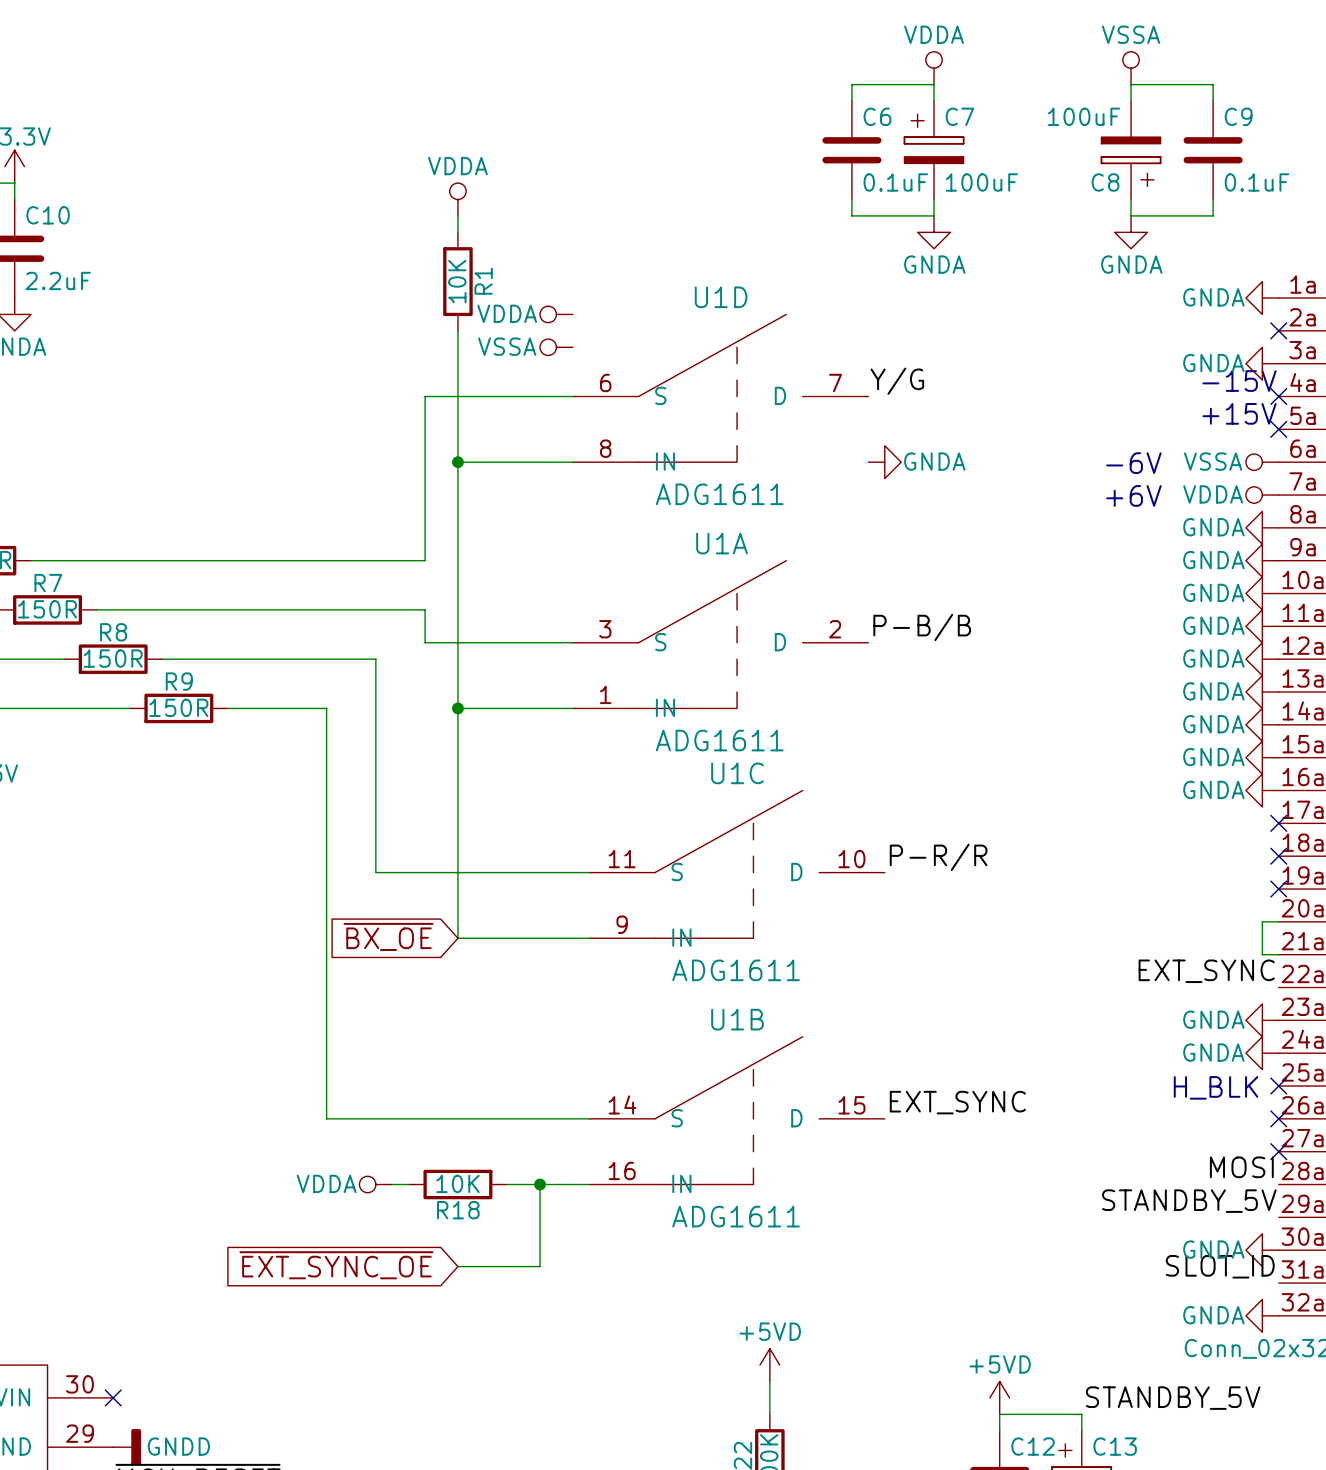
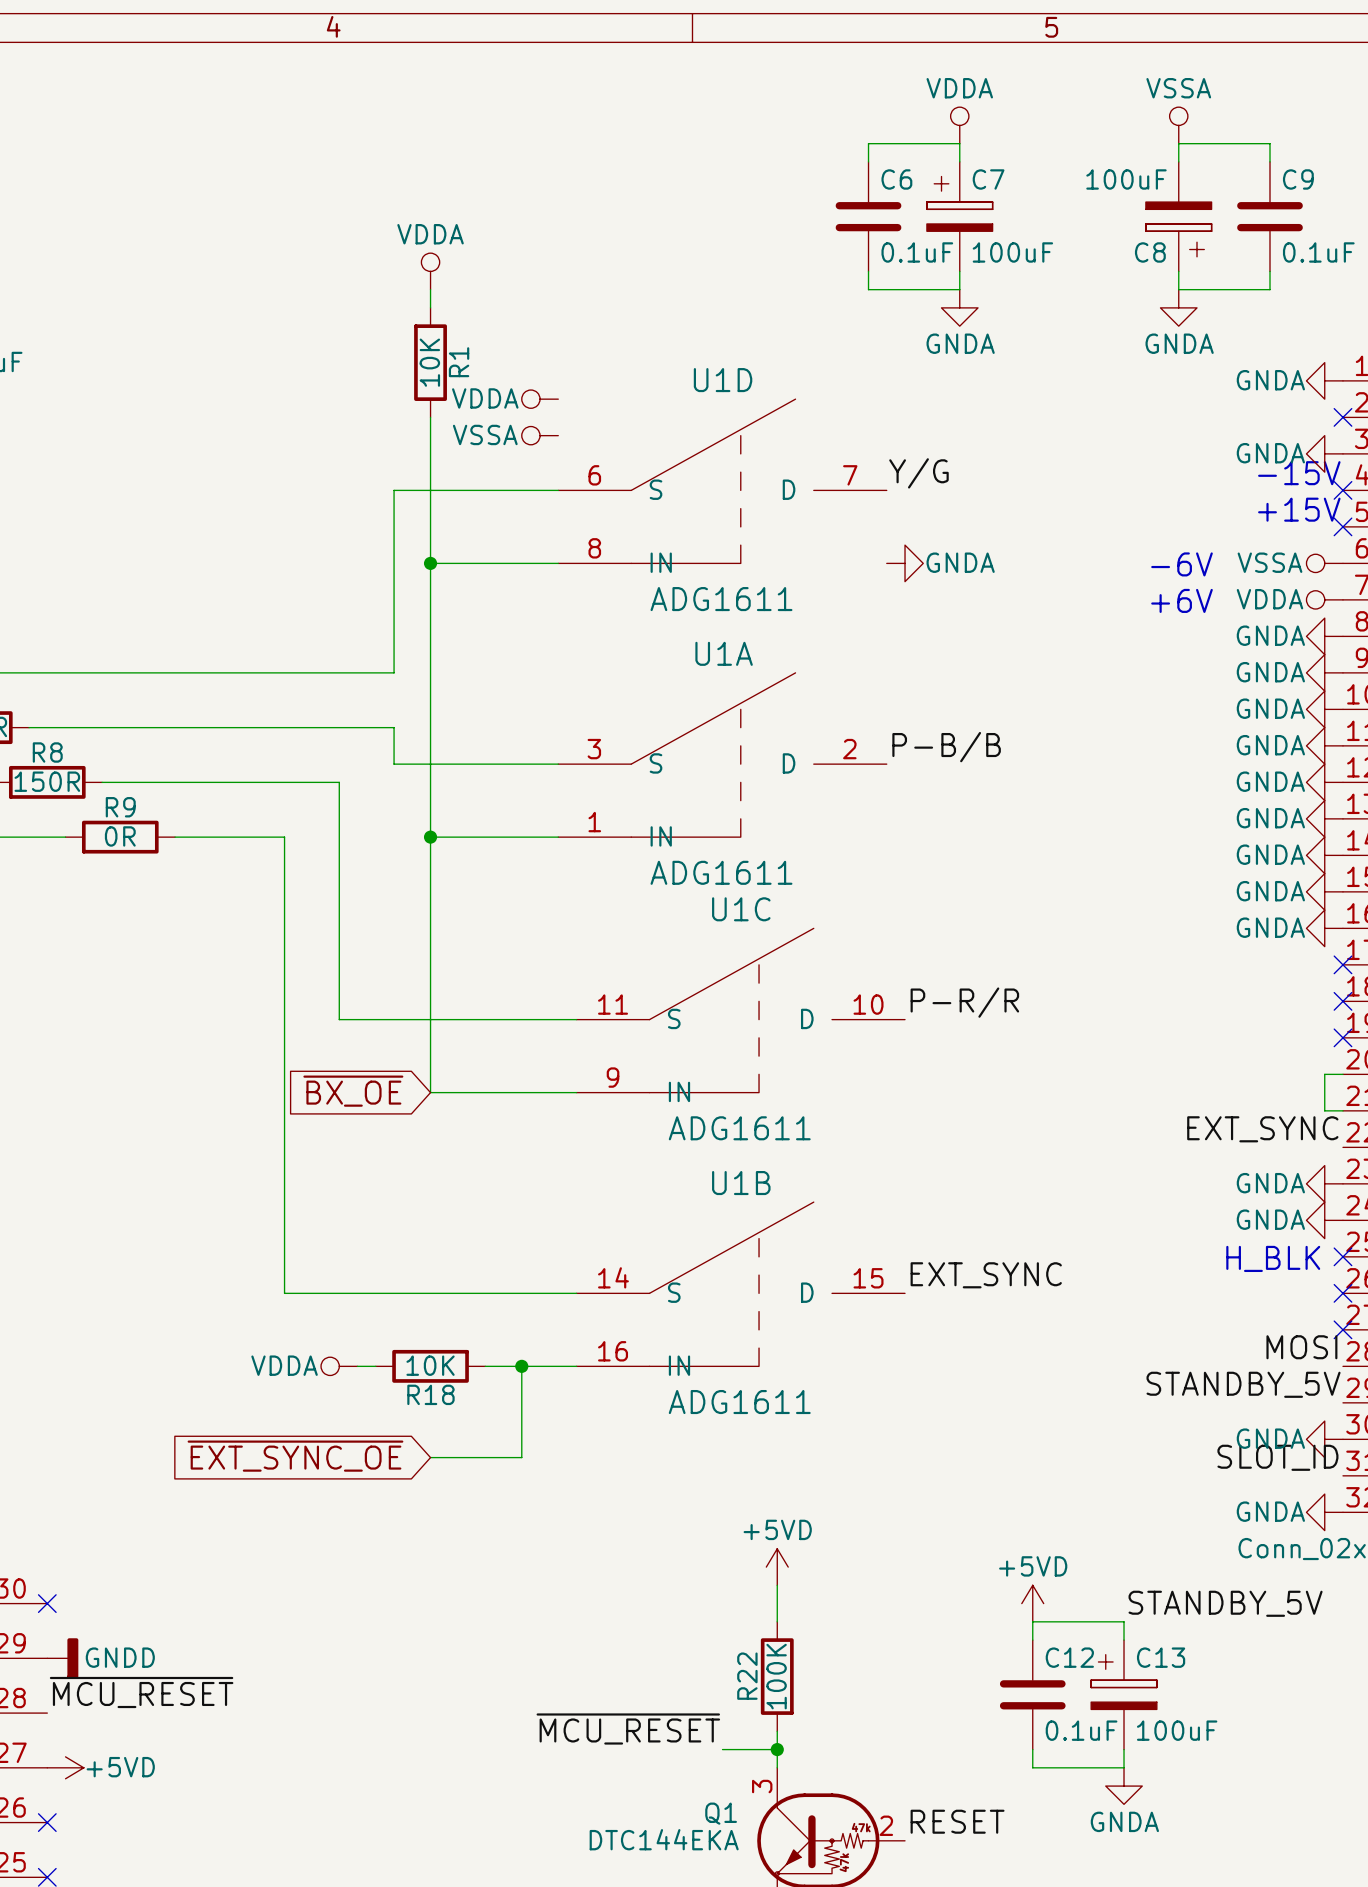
R9 value: 150R (178, 707) -> 0R (120, 836)

